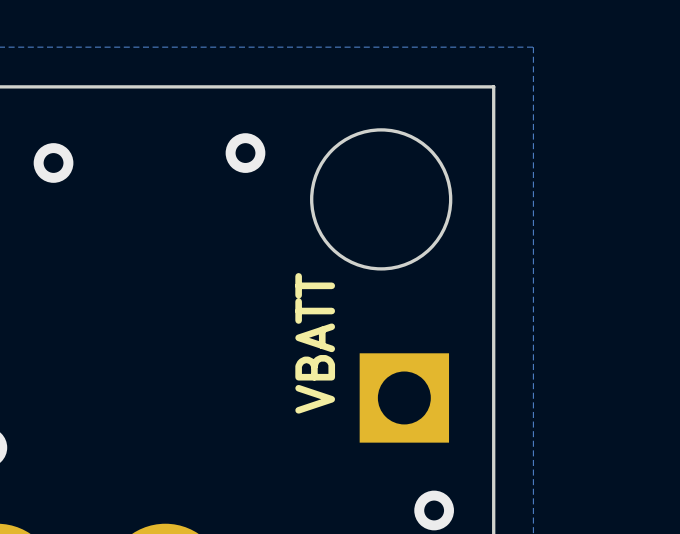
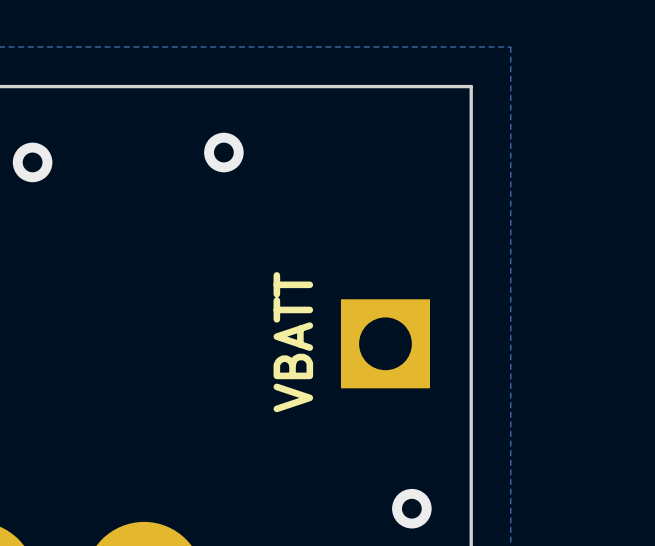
round board edge: [310, 128, 453, 271] -> none
part position: (404, 397) -> (385, 343)

